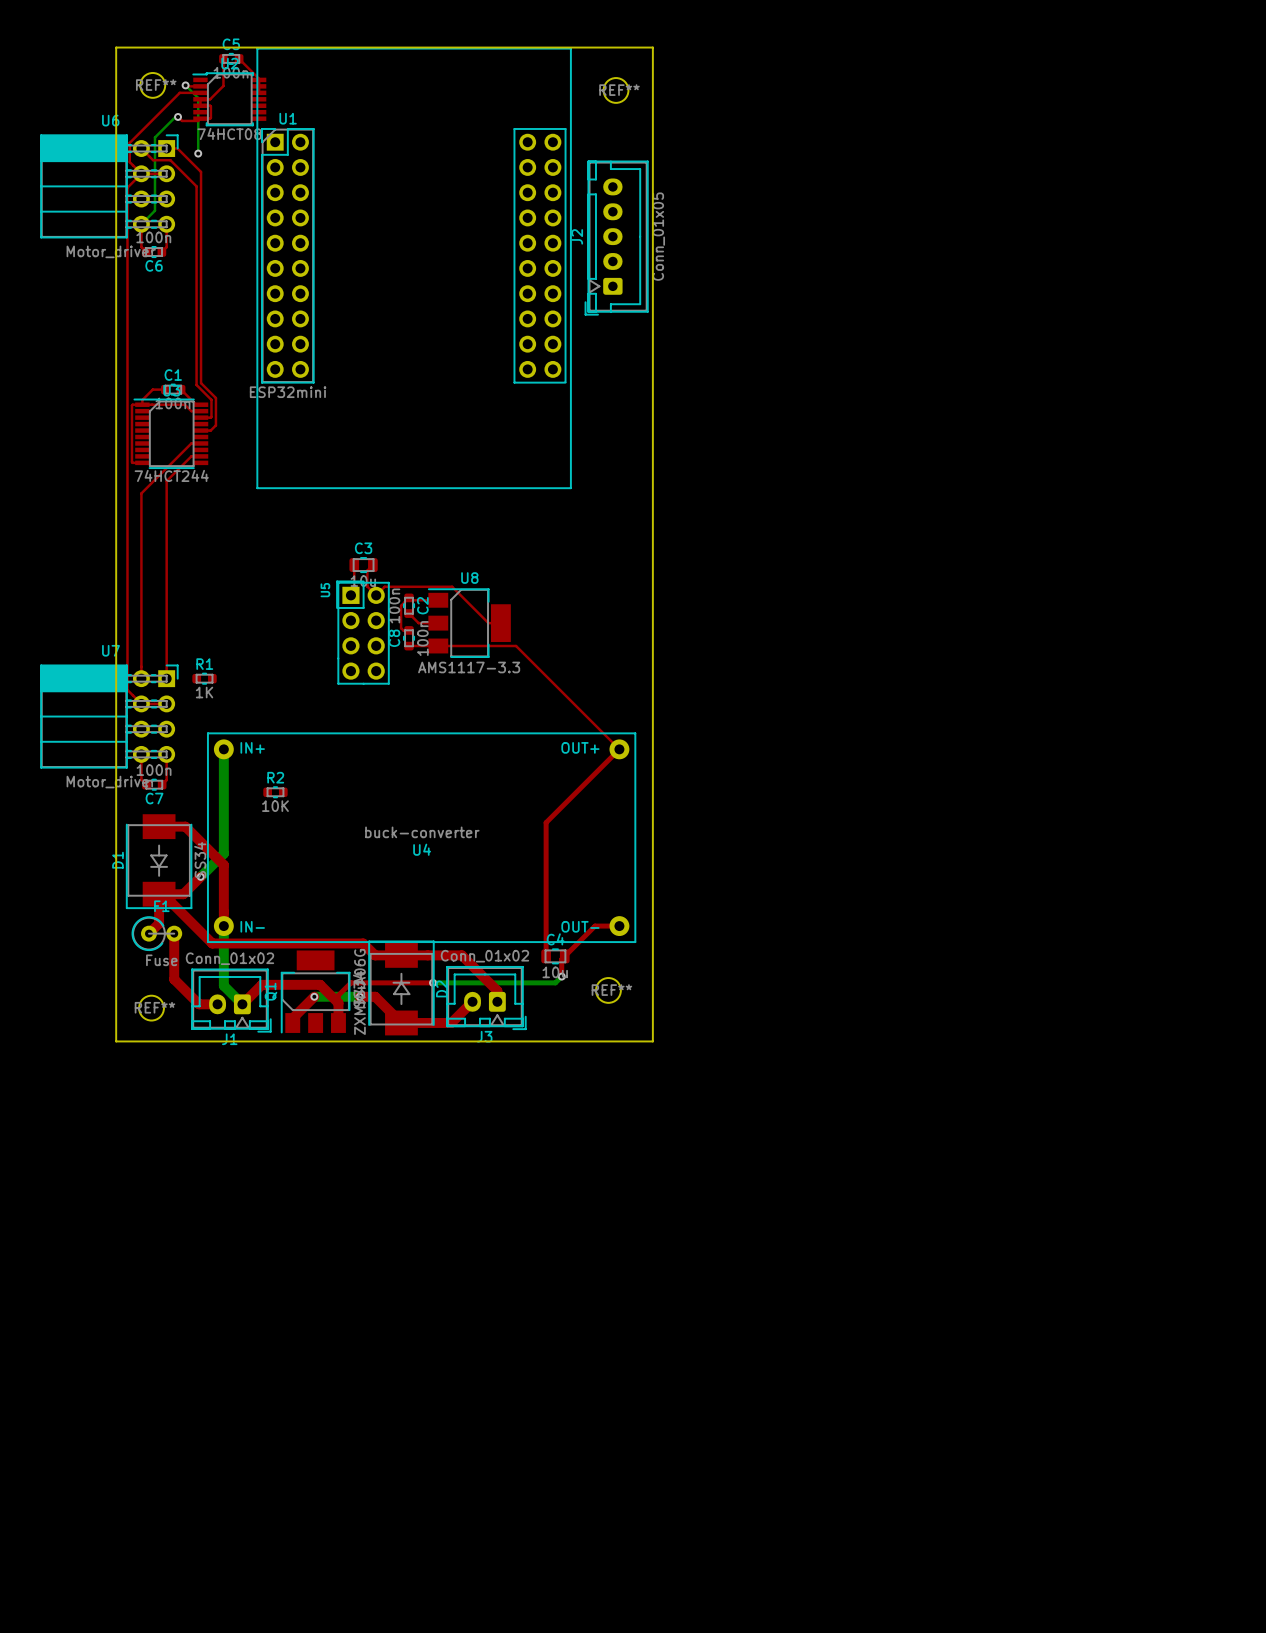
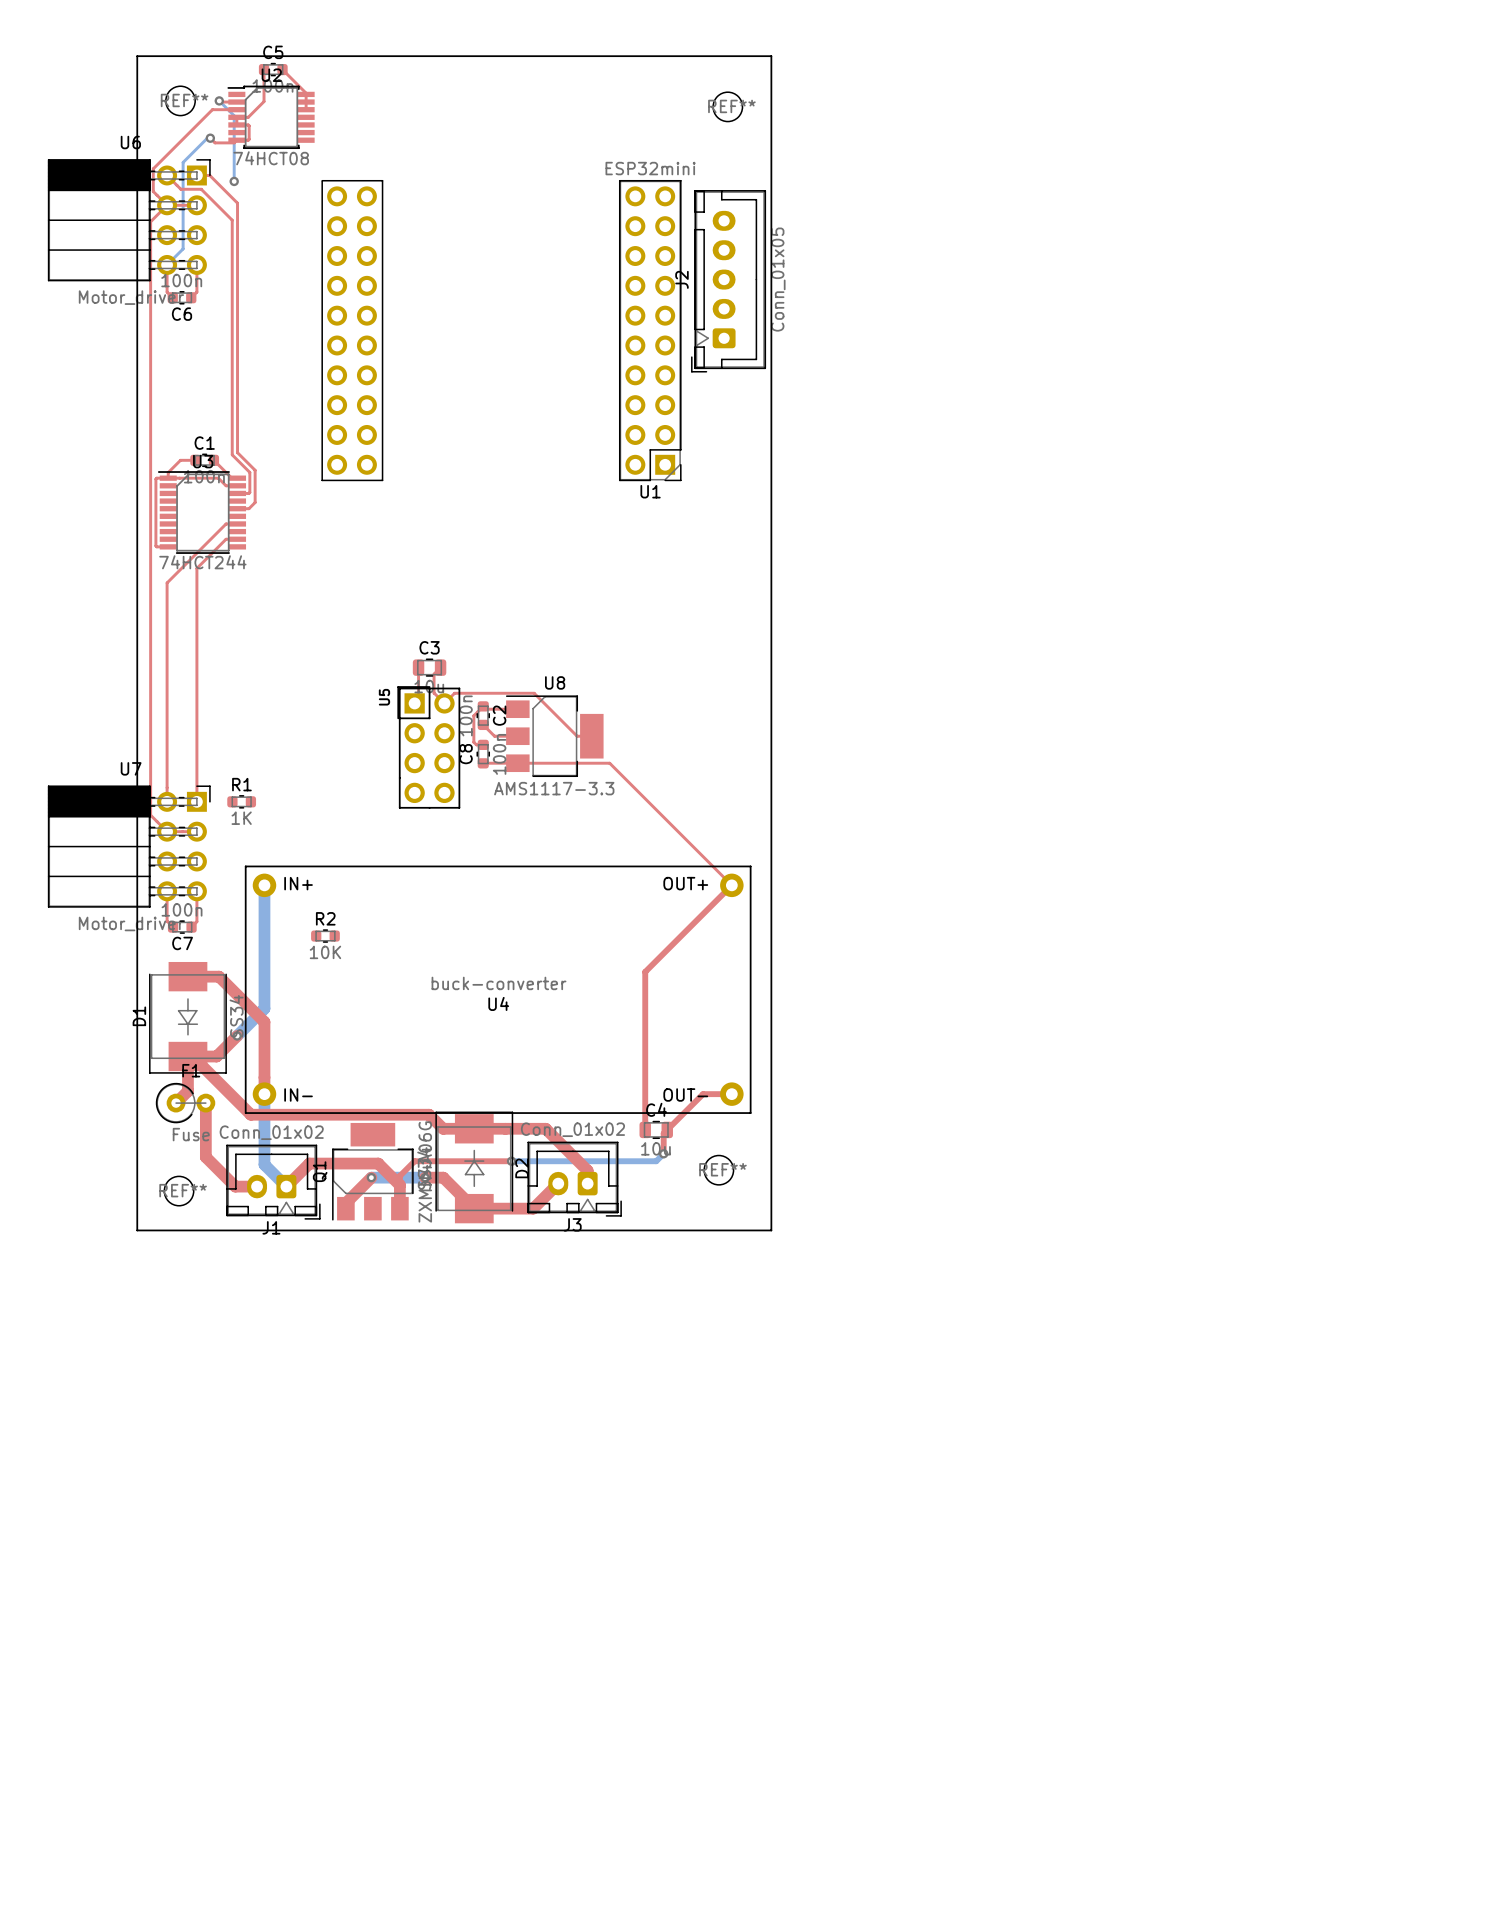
U1 footprint: [257, 48, 572, 489] -> [321, 180, 682, 482]
U1 name position: U1 (288, 118) -> U1 (650, 491)
U1 value position: ESP32mini (288, 392) -> ESP32mini (650, 168)

